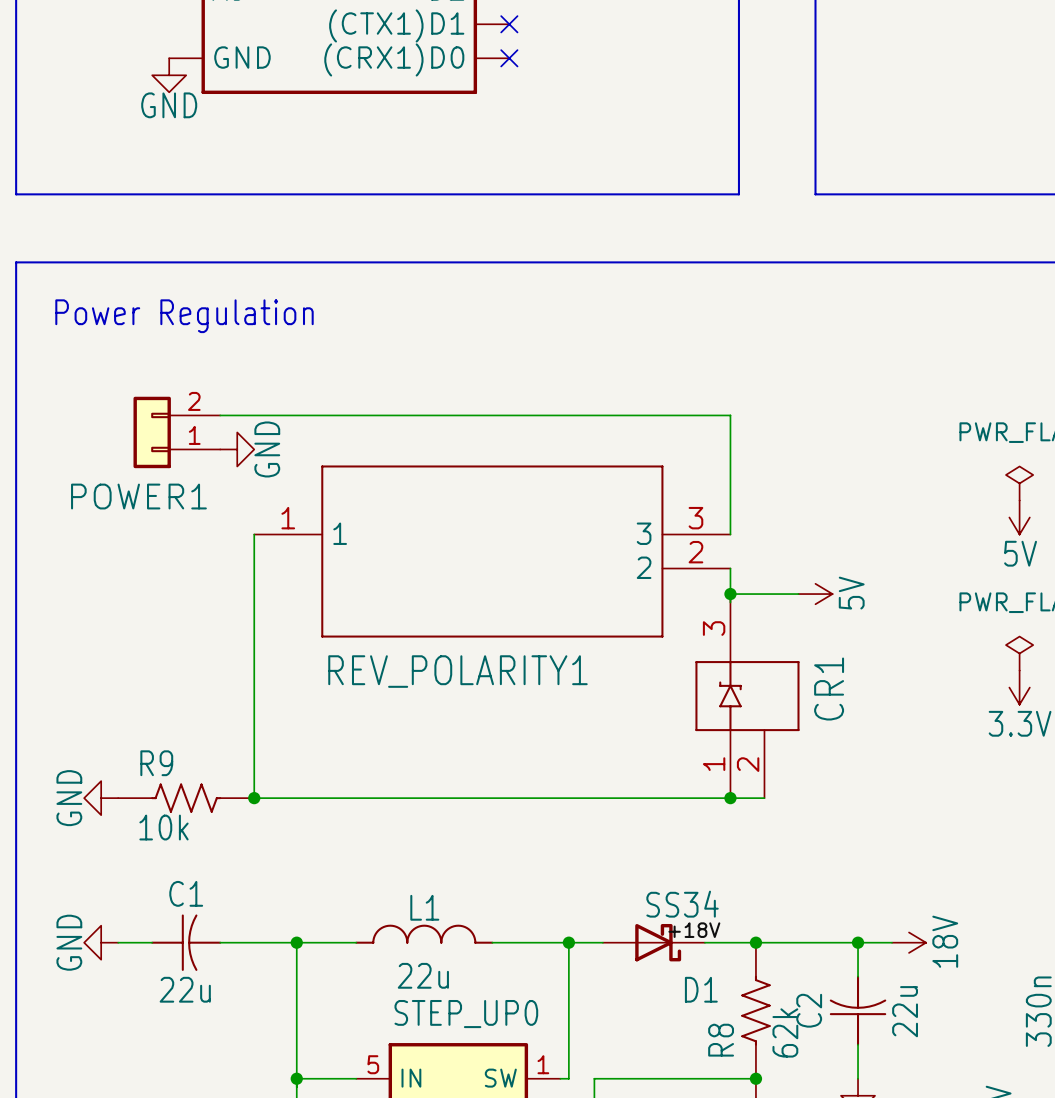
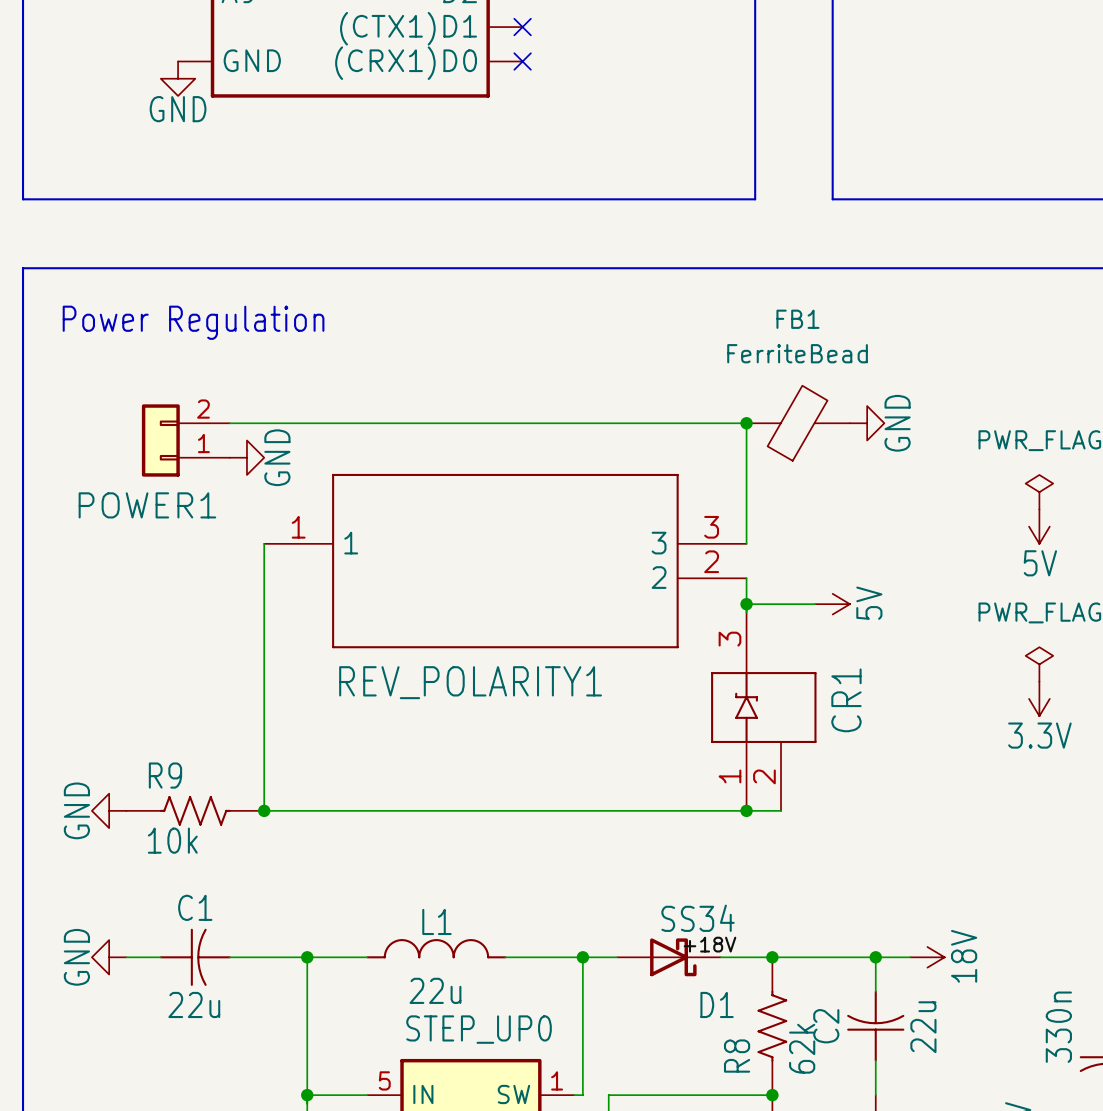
junction: none -> (746, 423)
FB1: none -> FerriteBead (798, 423)
power symbol: none -> GND (867, 423)

